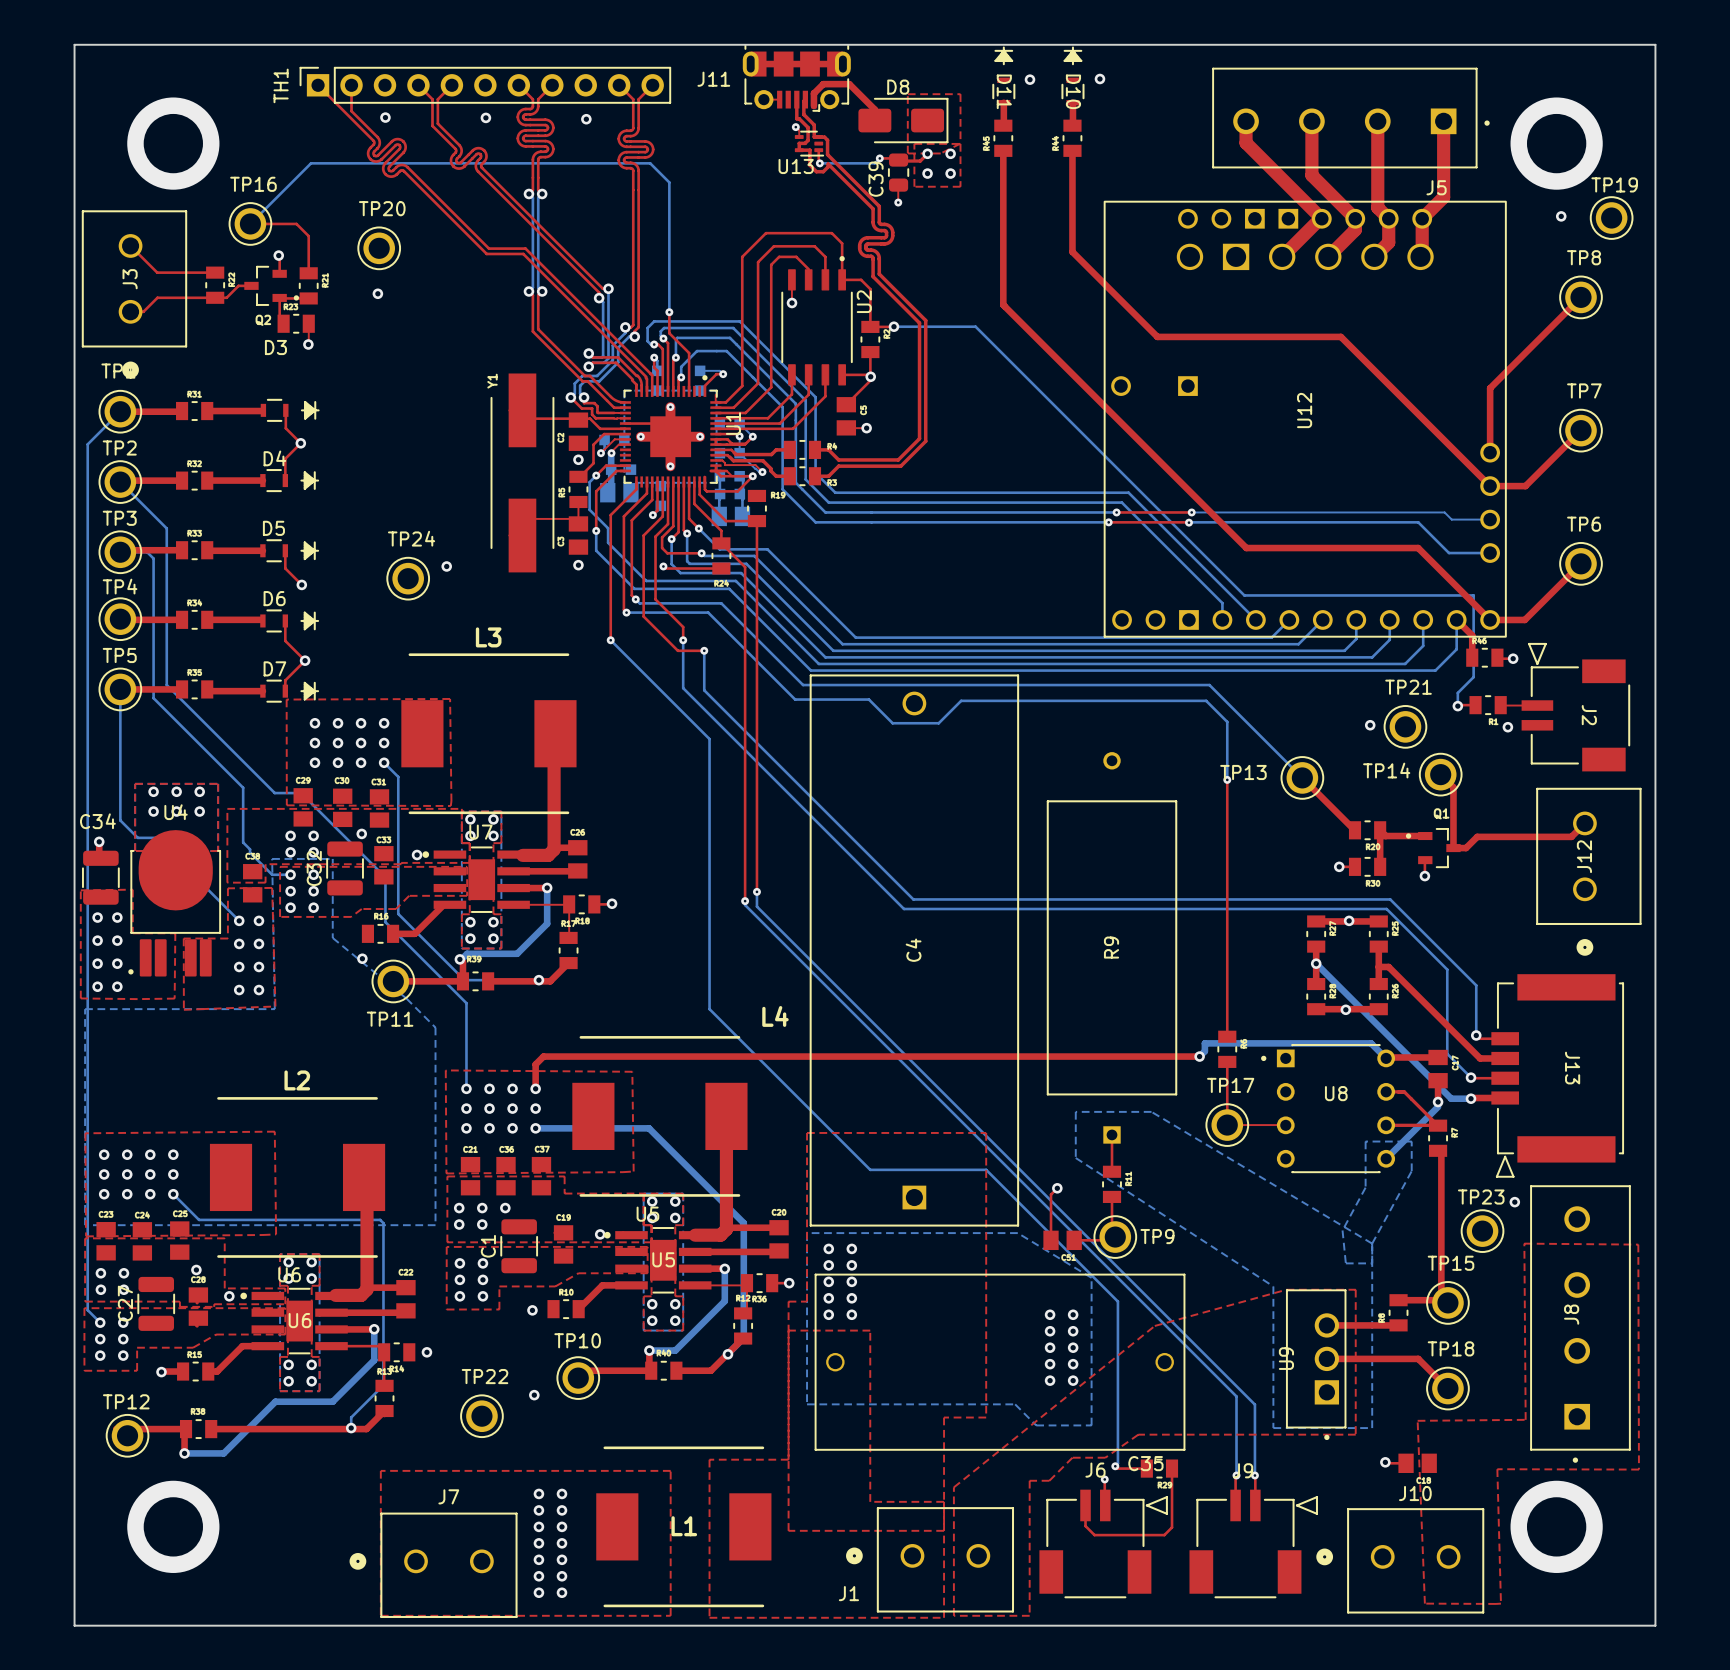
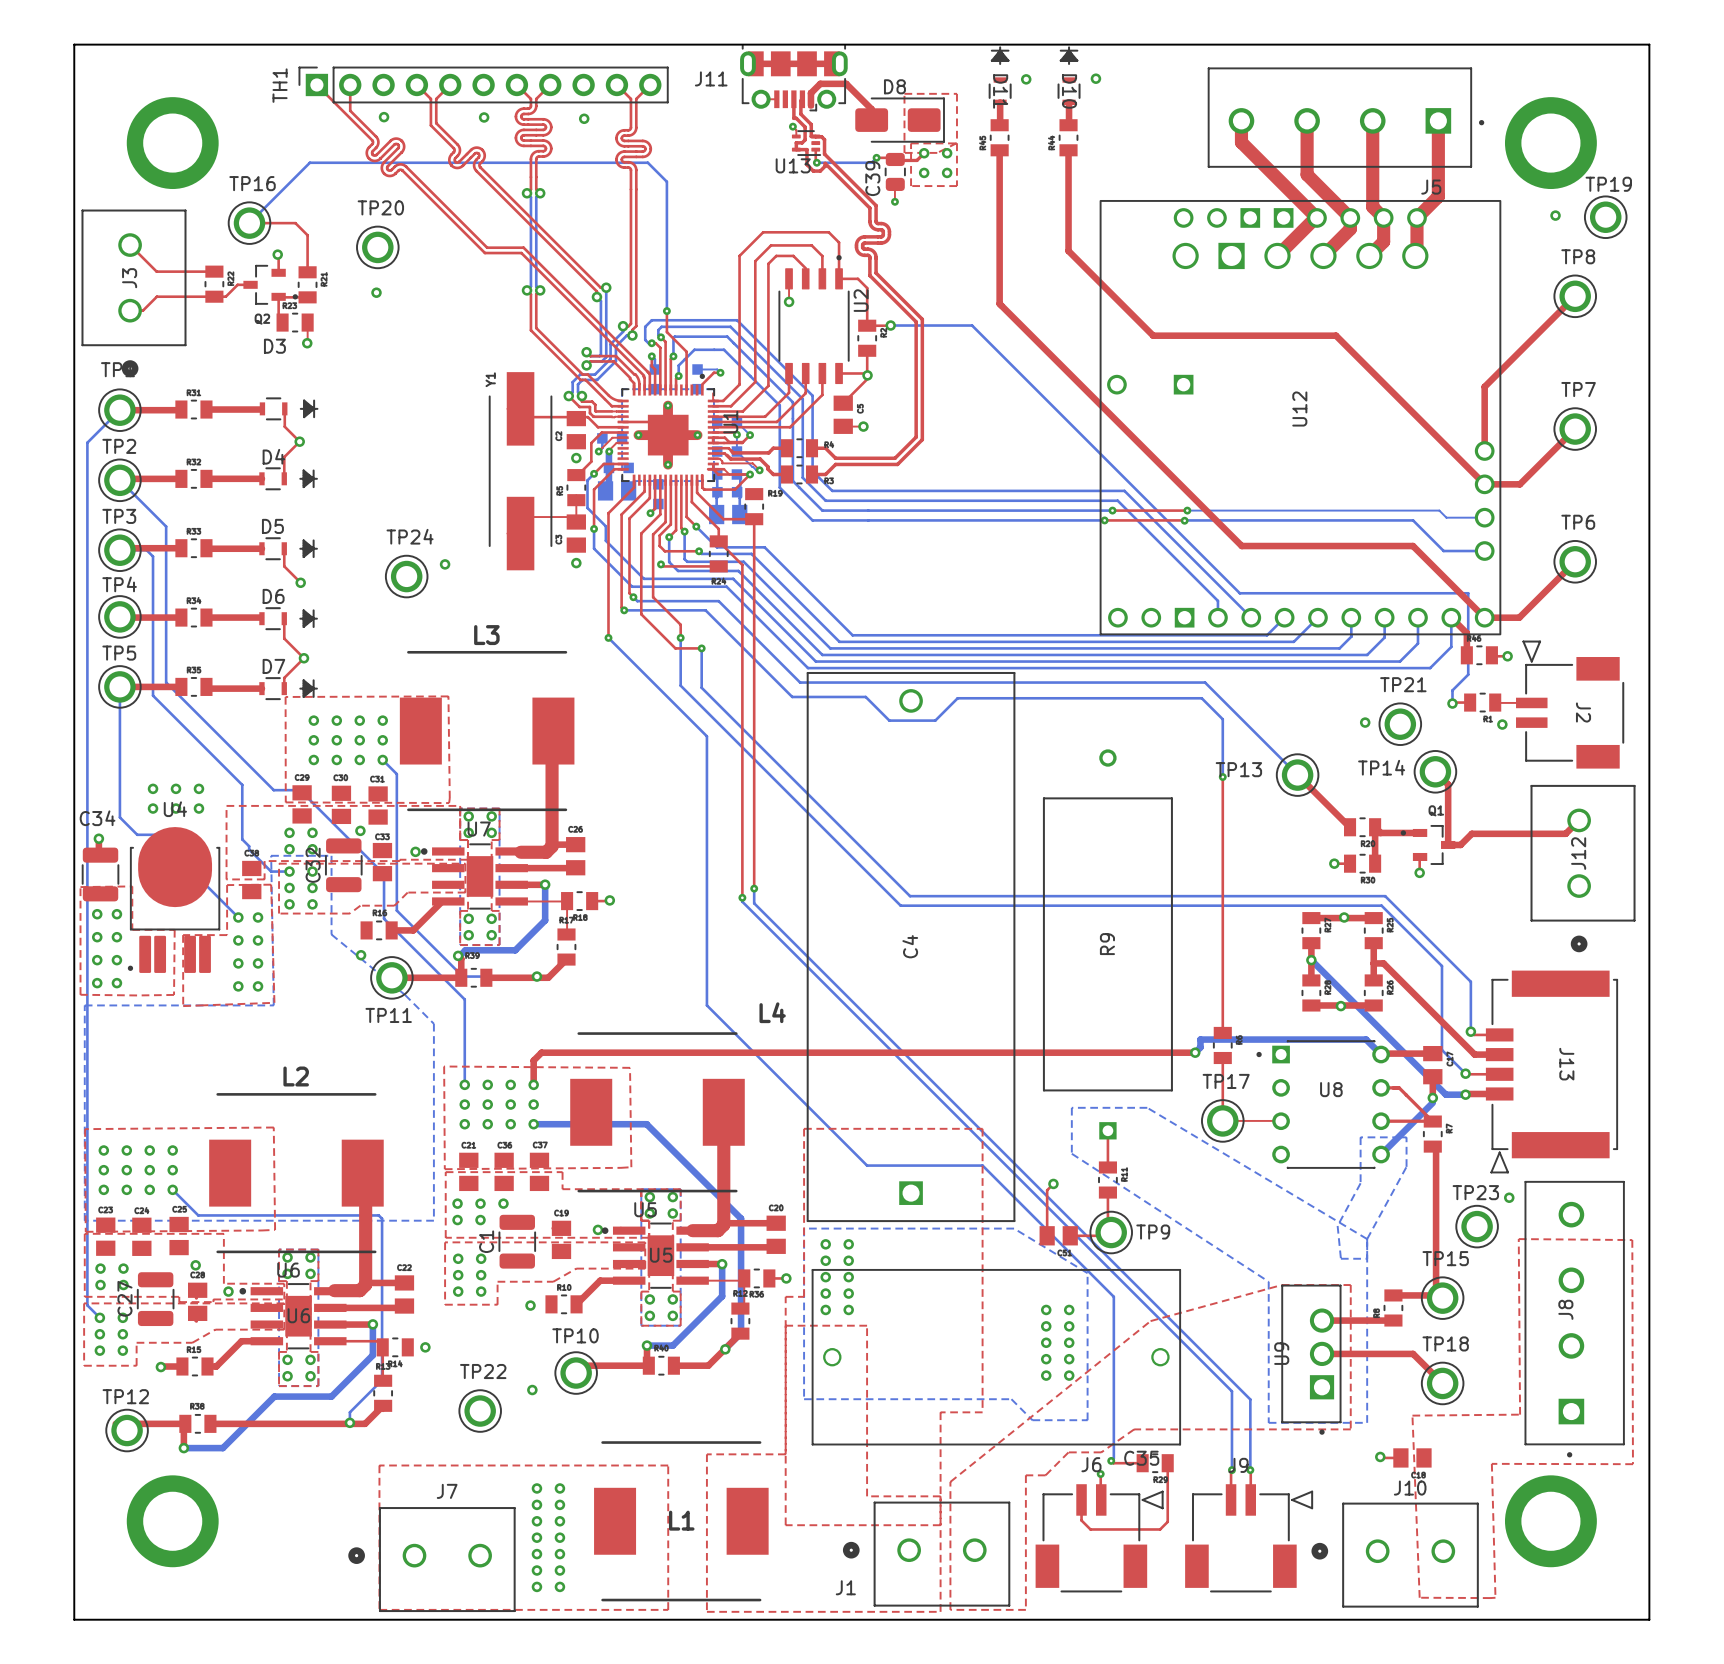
top zone outline: (135, 783) (218, 783) (218, 851) (135, 851) (135, 783) -> none

